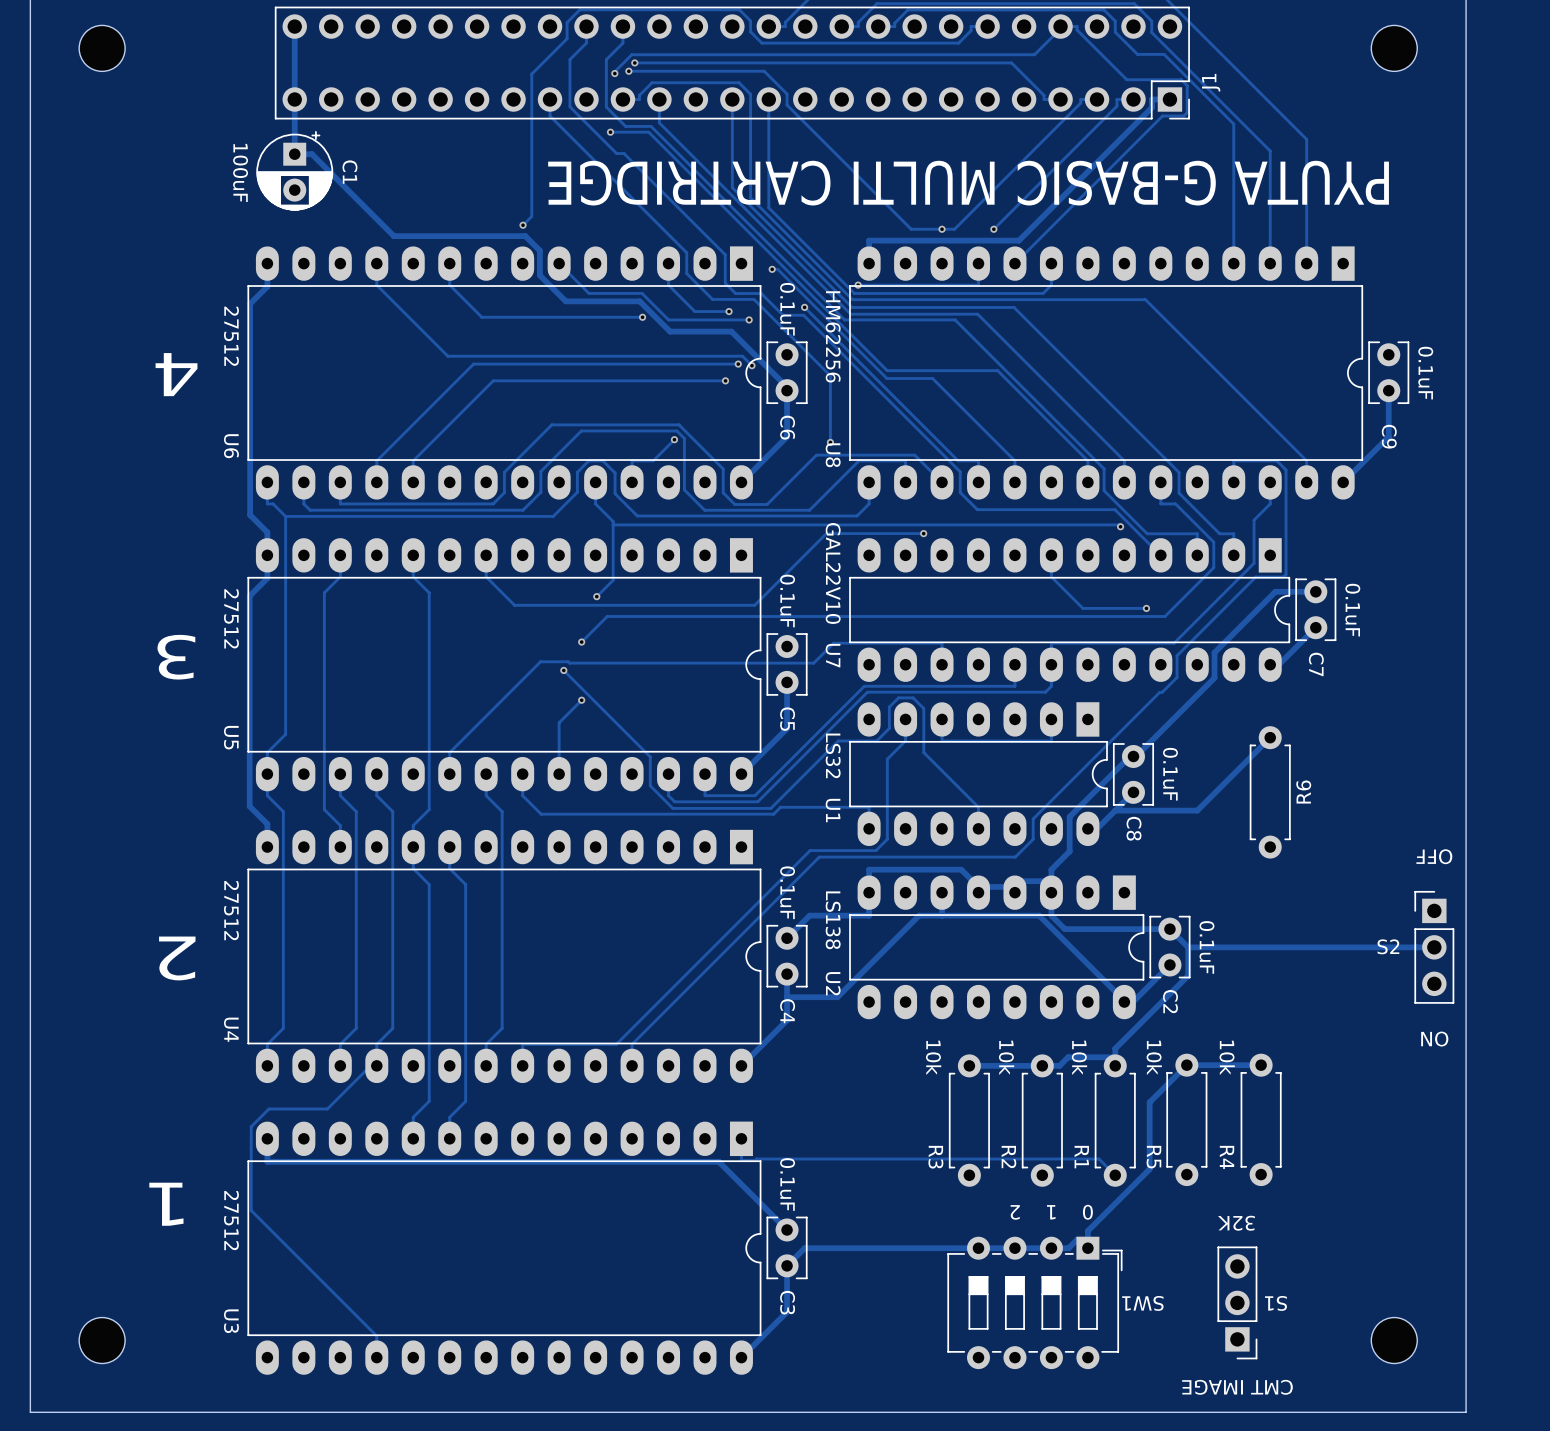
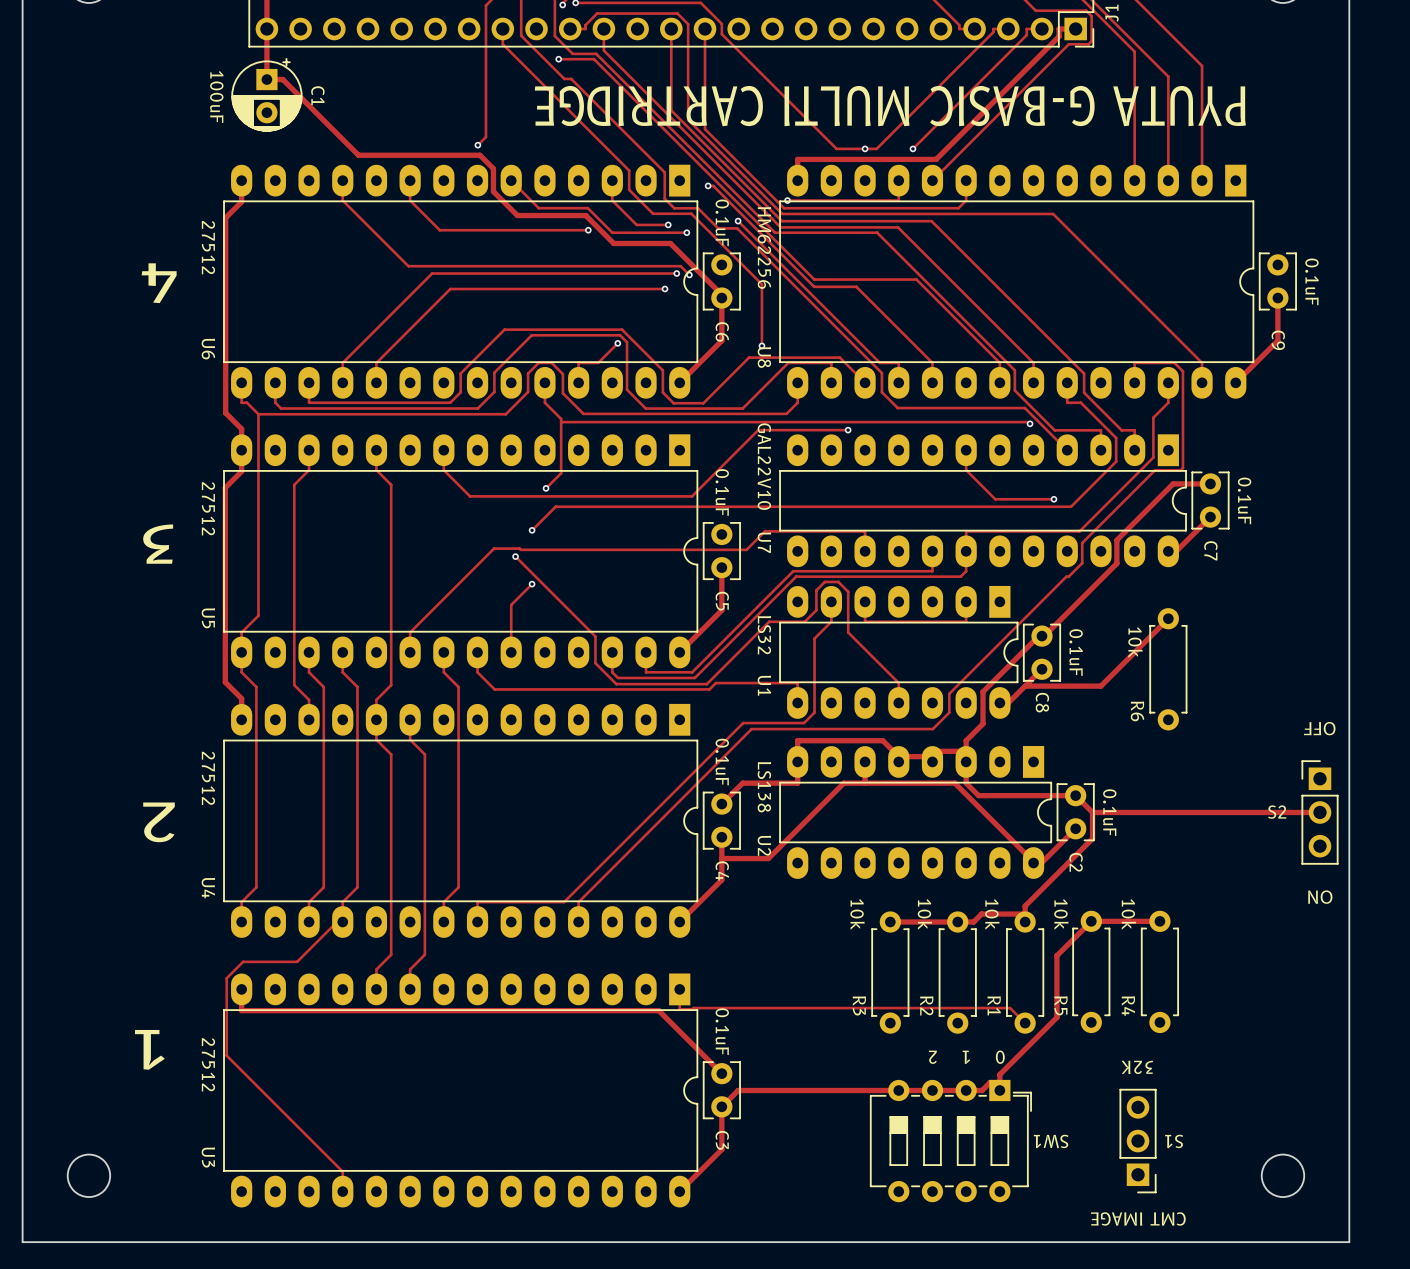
text: none -> 10k (1135, 642)
R6 name rotation: 0° (1303, 792) -> 180° (1137, 711)
R6 name position: R6 (1303, 792) -> R6 (1137, 711)

